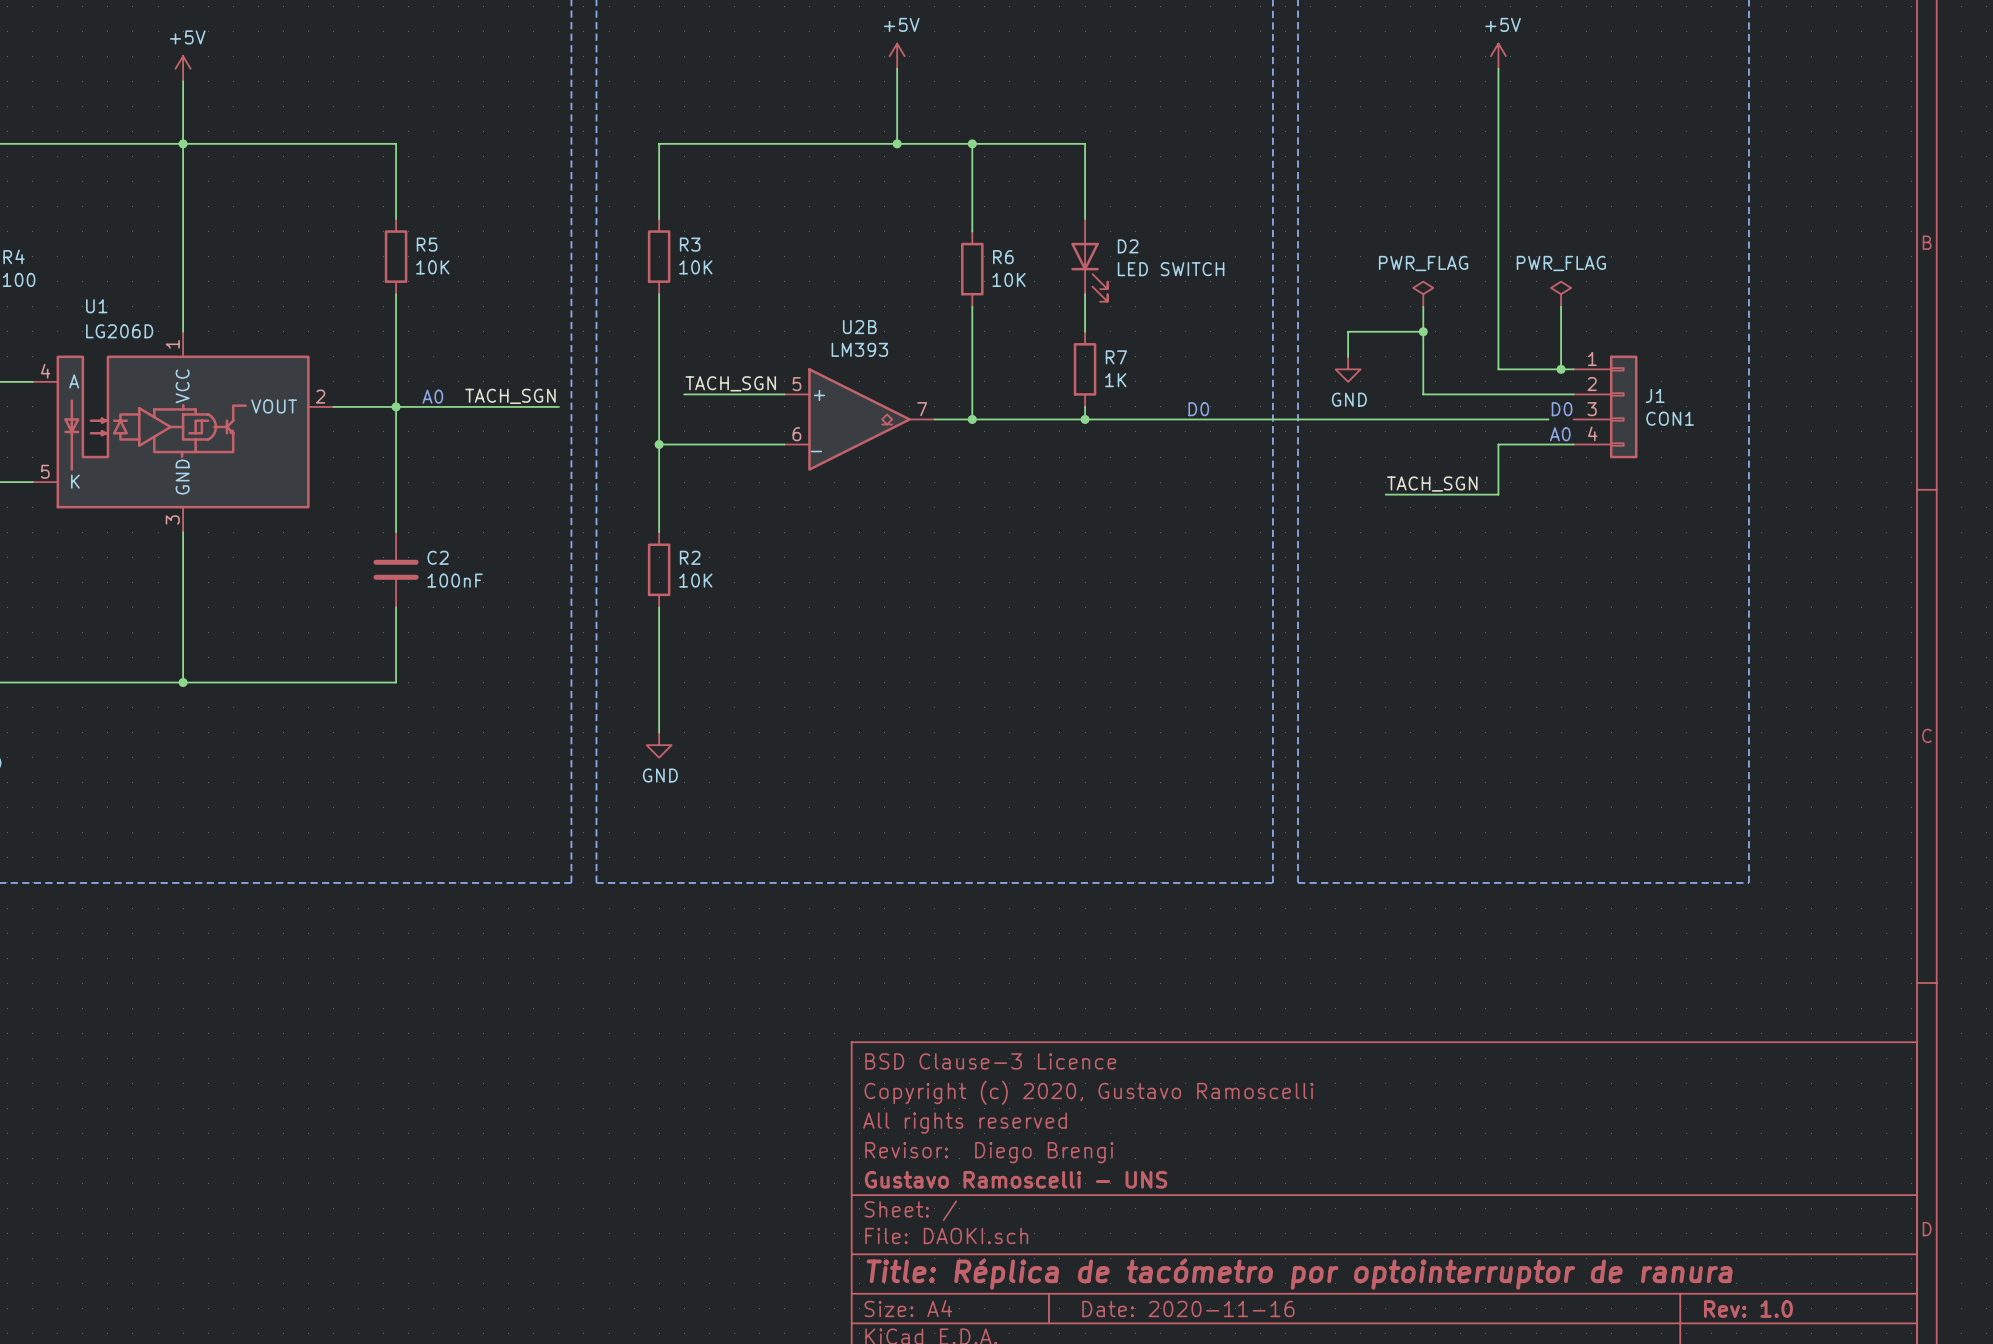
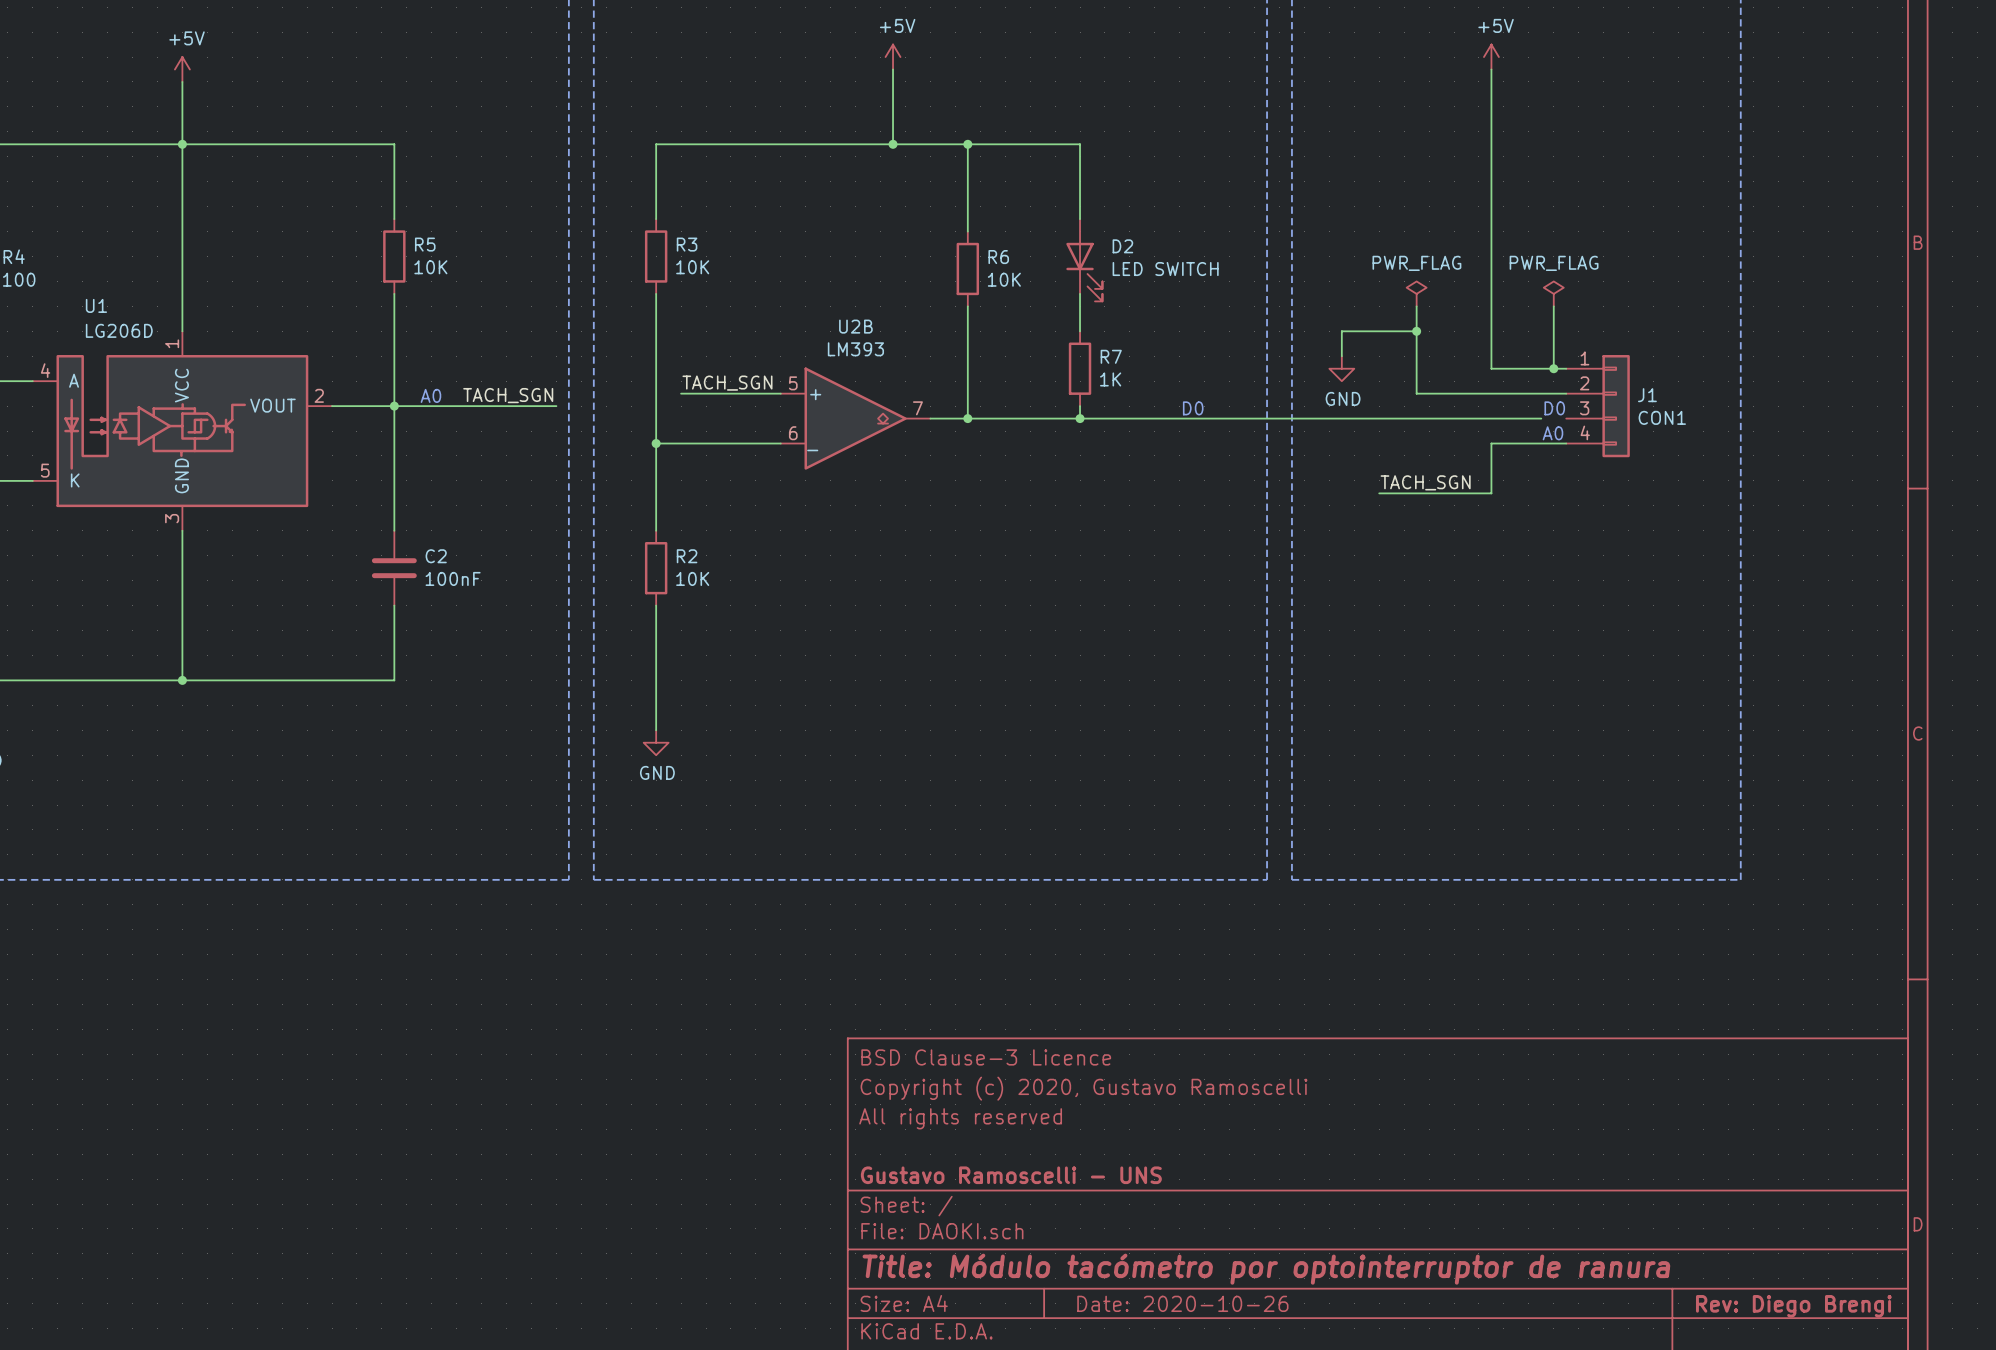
title block: Revisor: Diego Brengi (989, 1152) -> none
title block: Title: Réplica de tacómetro por optointerruptor de ranura (1299, 1274) -> Title: Módulo tacómetro por optointerruptor de ranura (1266, 1269)
title block: Date: 2020-11-16 (1188, 1308) -> Date: 2020-10-26 (1182, 1303)
title block: Rev: 1.0 (1748, 1308) -> Rev: Diego Brengi (1793, 1306)

